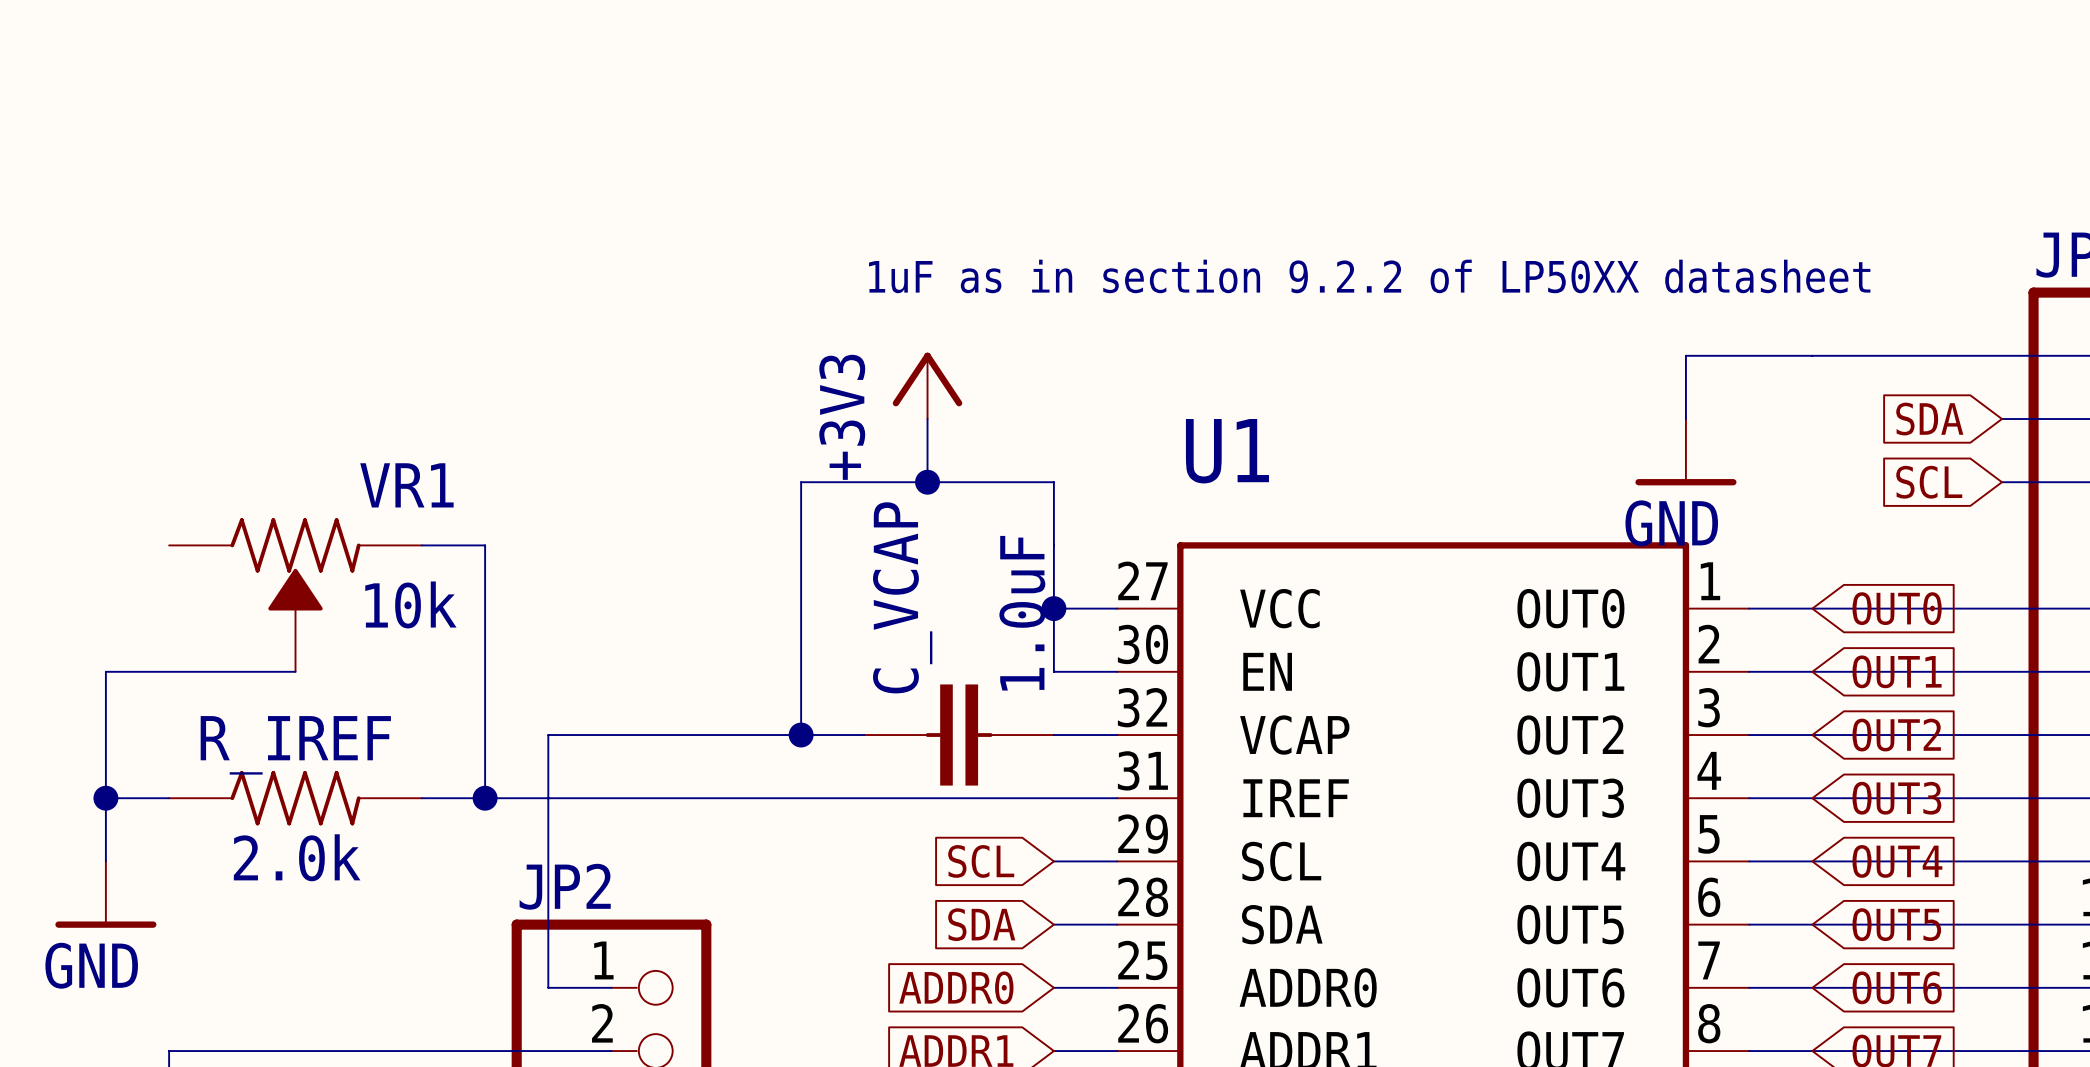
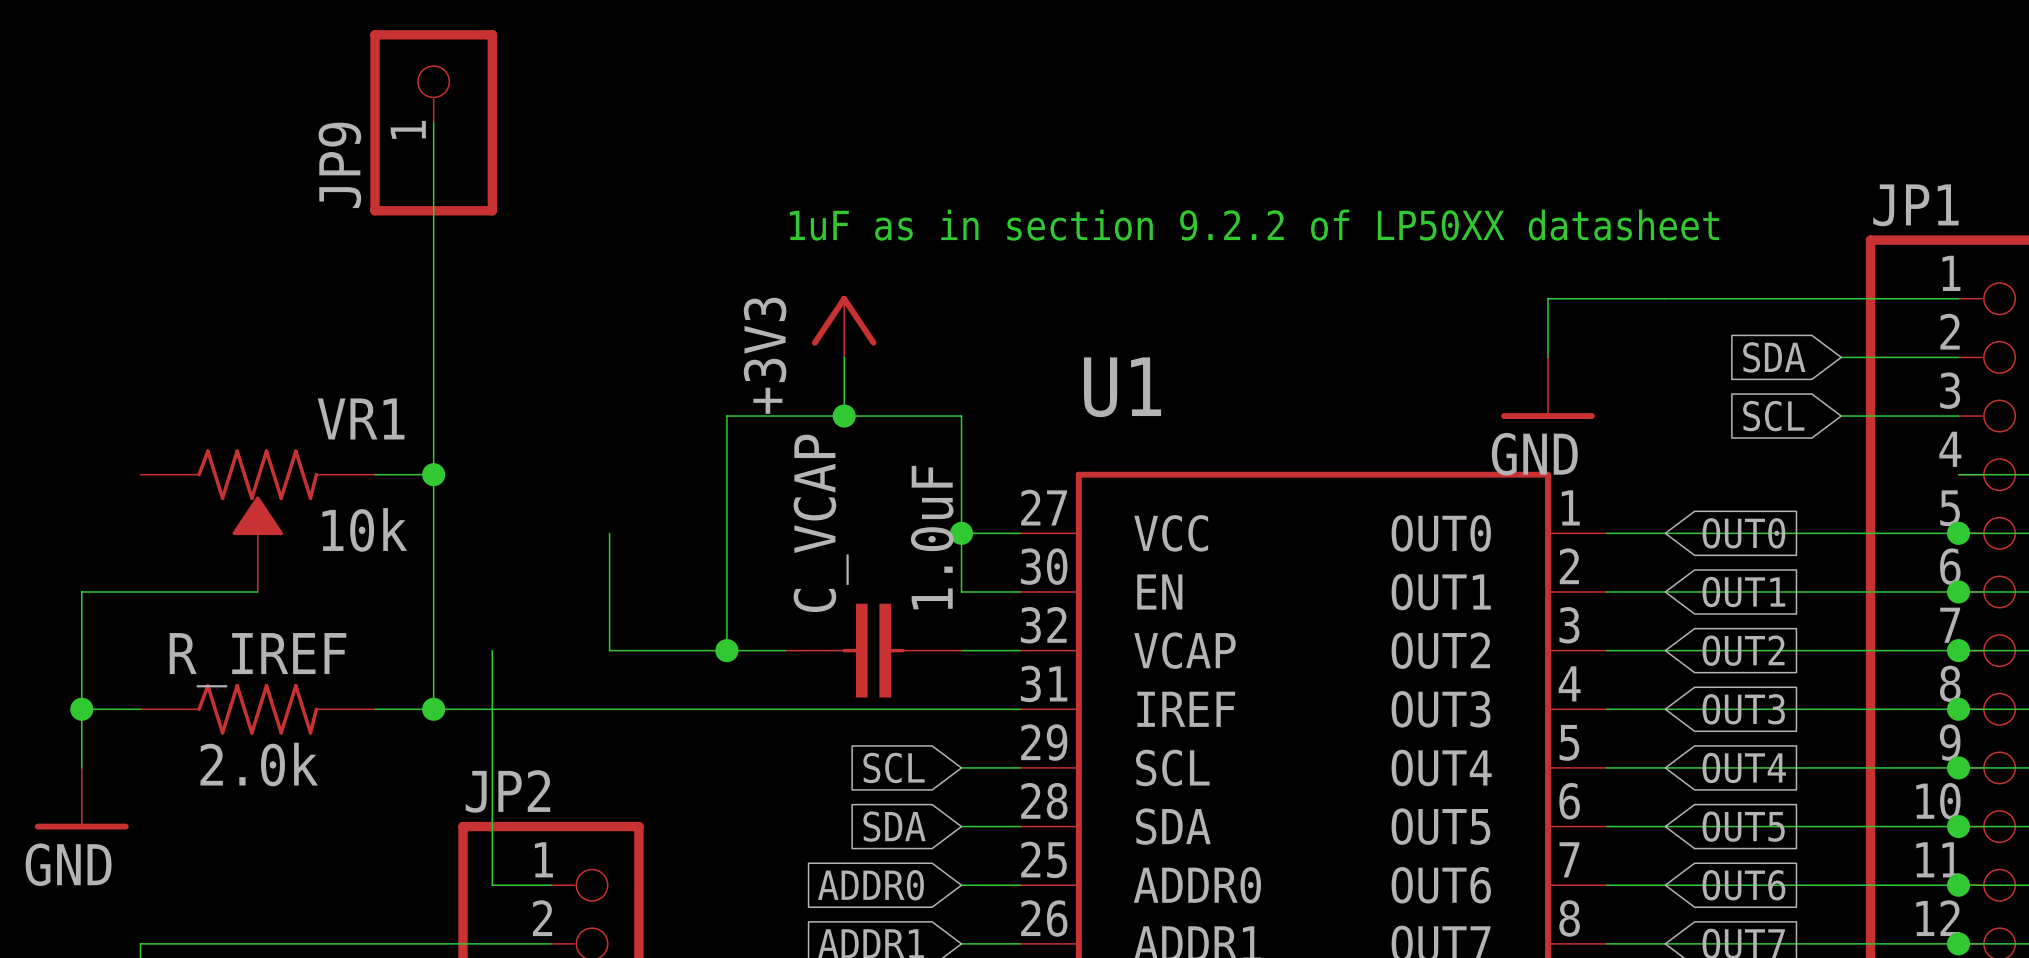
wire: none -> (433, 122) (433, 474)
JP9: none -> (433, 122)
junction: none -> (433, 474)
wire: (548, 735) (674, 735) -> (609, 533) (609, 650)

